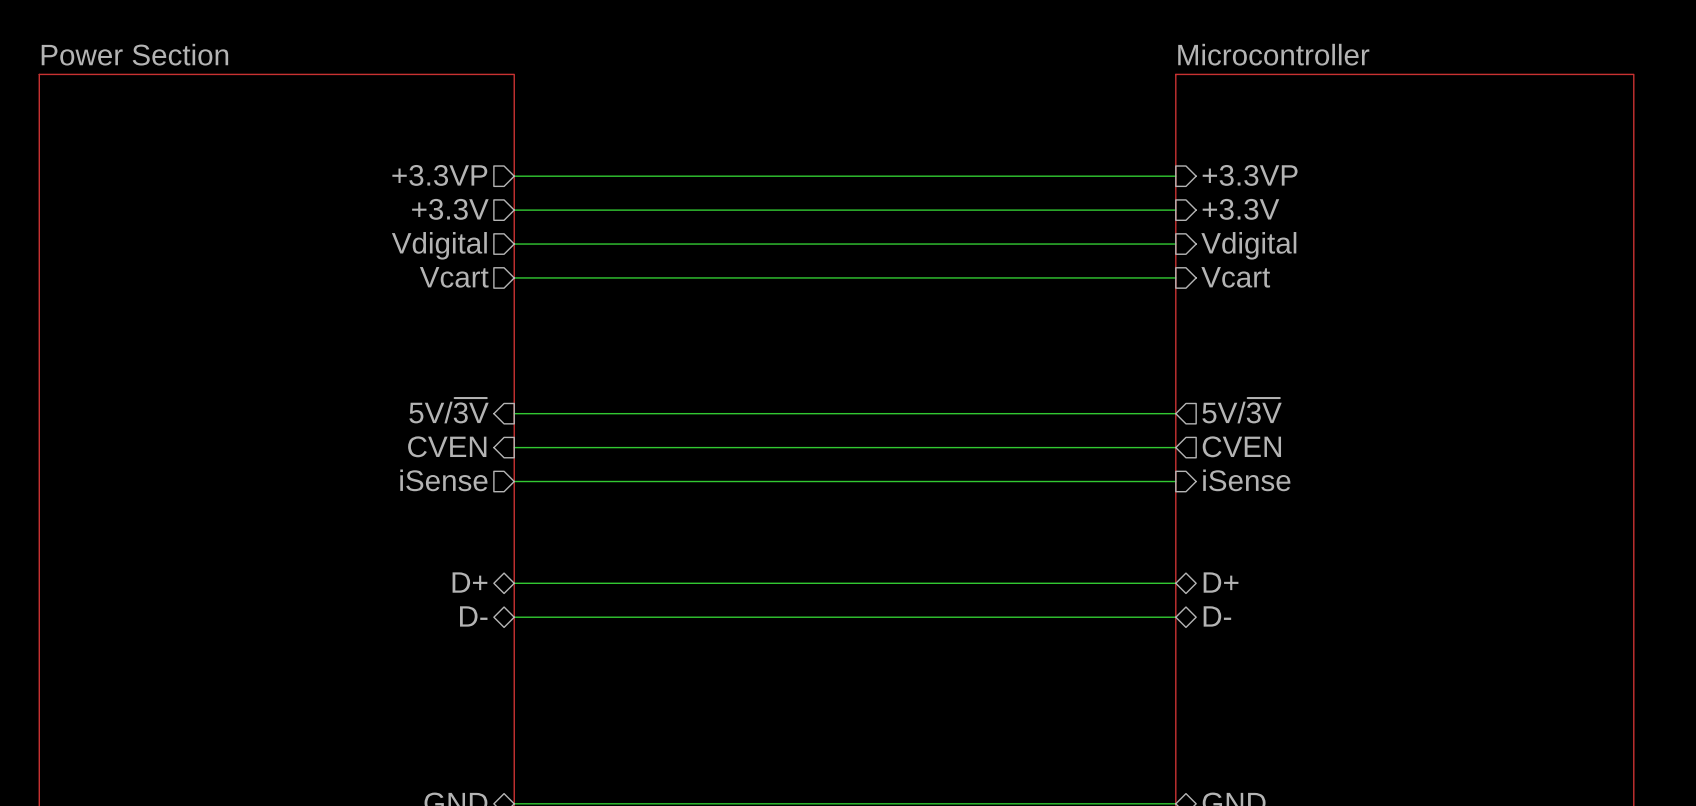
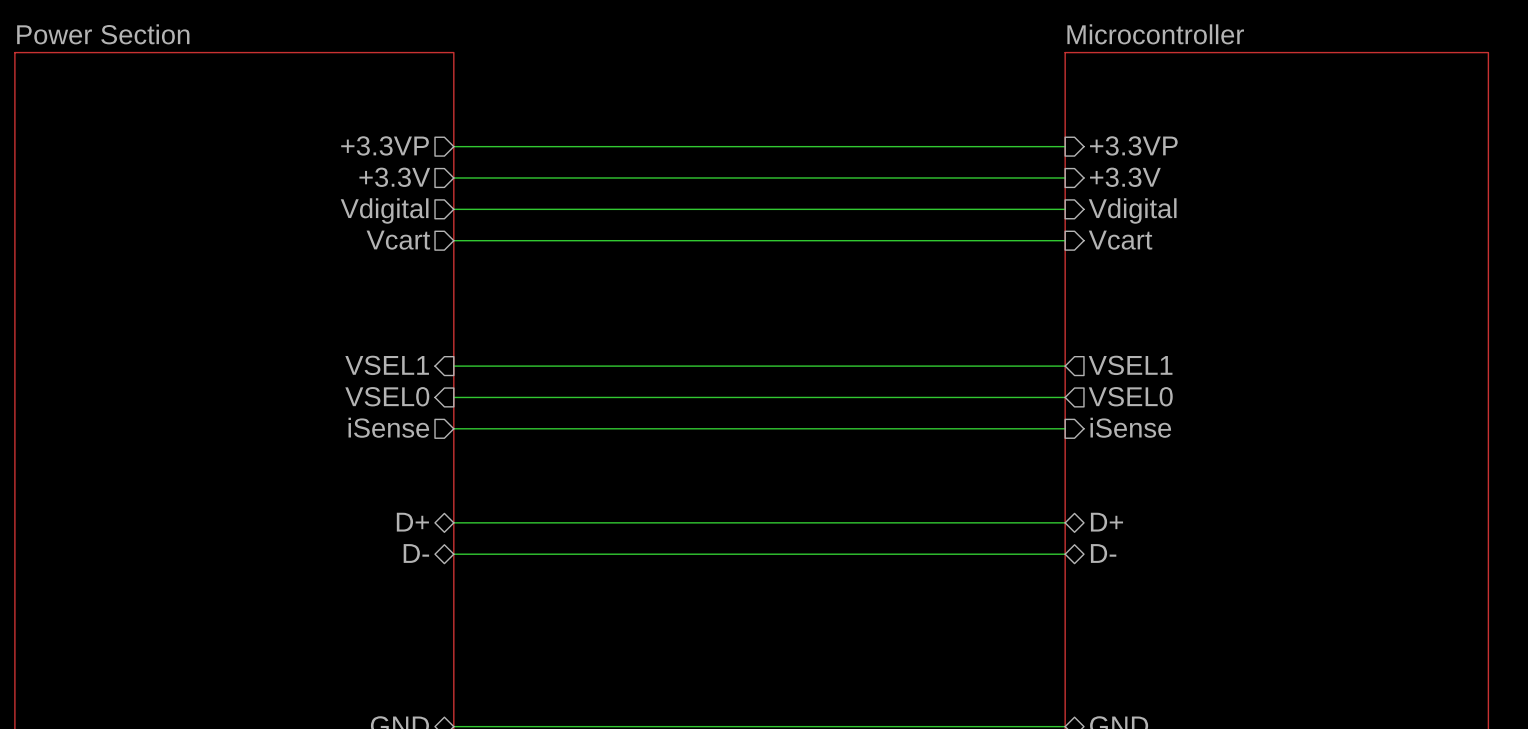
sheet pin: 5V/~{3V} (449, 410) -> VSEL1 (387, 365)
sheet pin: 5V/~{3V} (1242, 410) -> VSEL1 (1130, 365)
sheet pin: CVEN (447, 446) -> VSEL0 (387, 396)
sheet pin: CVEN (1241, 446) -> VSEL0 (1130, 396)

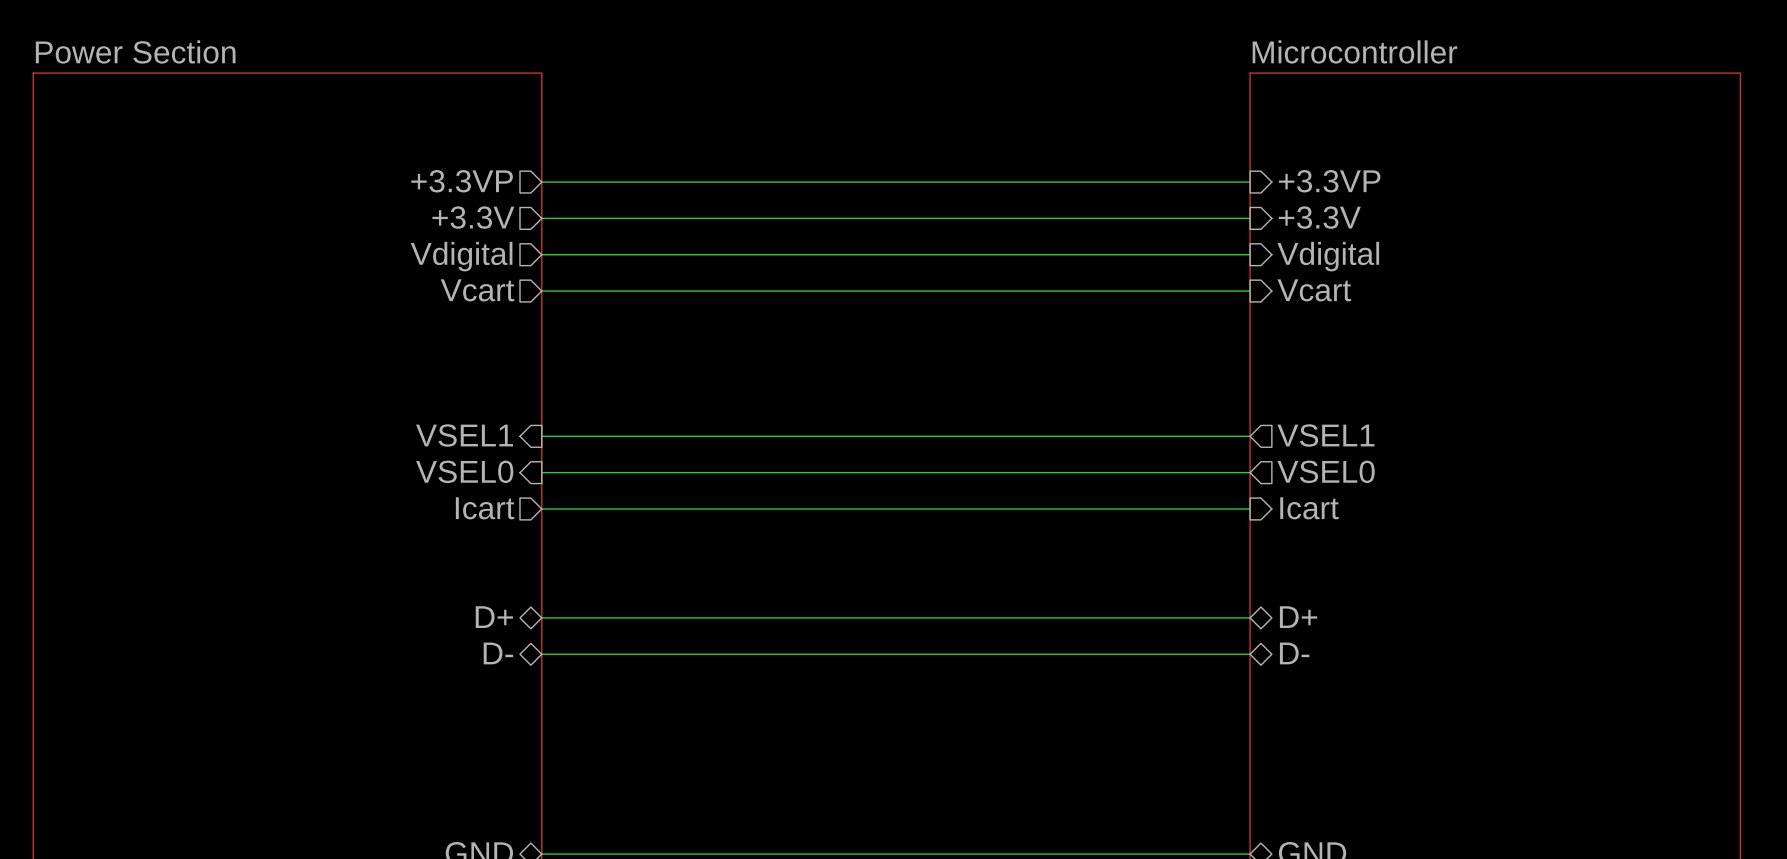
sheet pin: iSense (388, 427) -> Icart (485, 508)
sheet pin: iSense (1130, 427) -> Icart (1309, 508)

